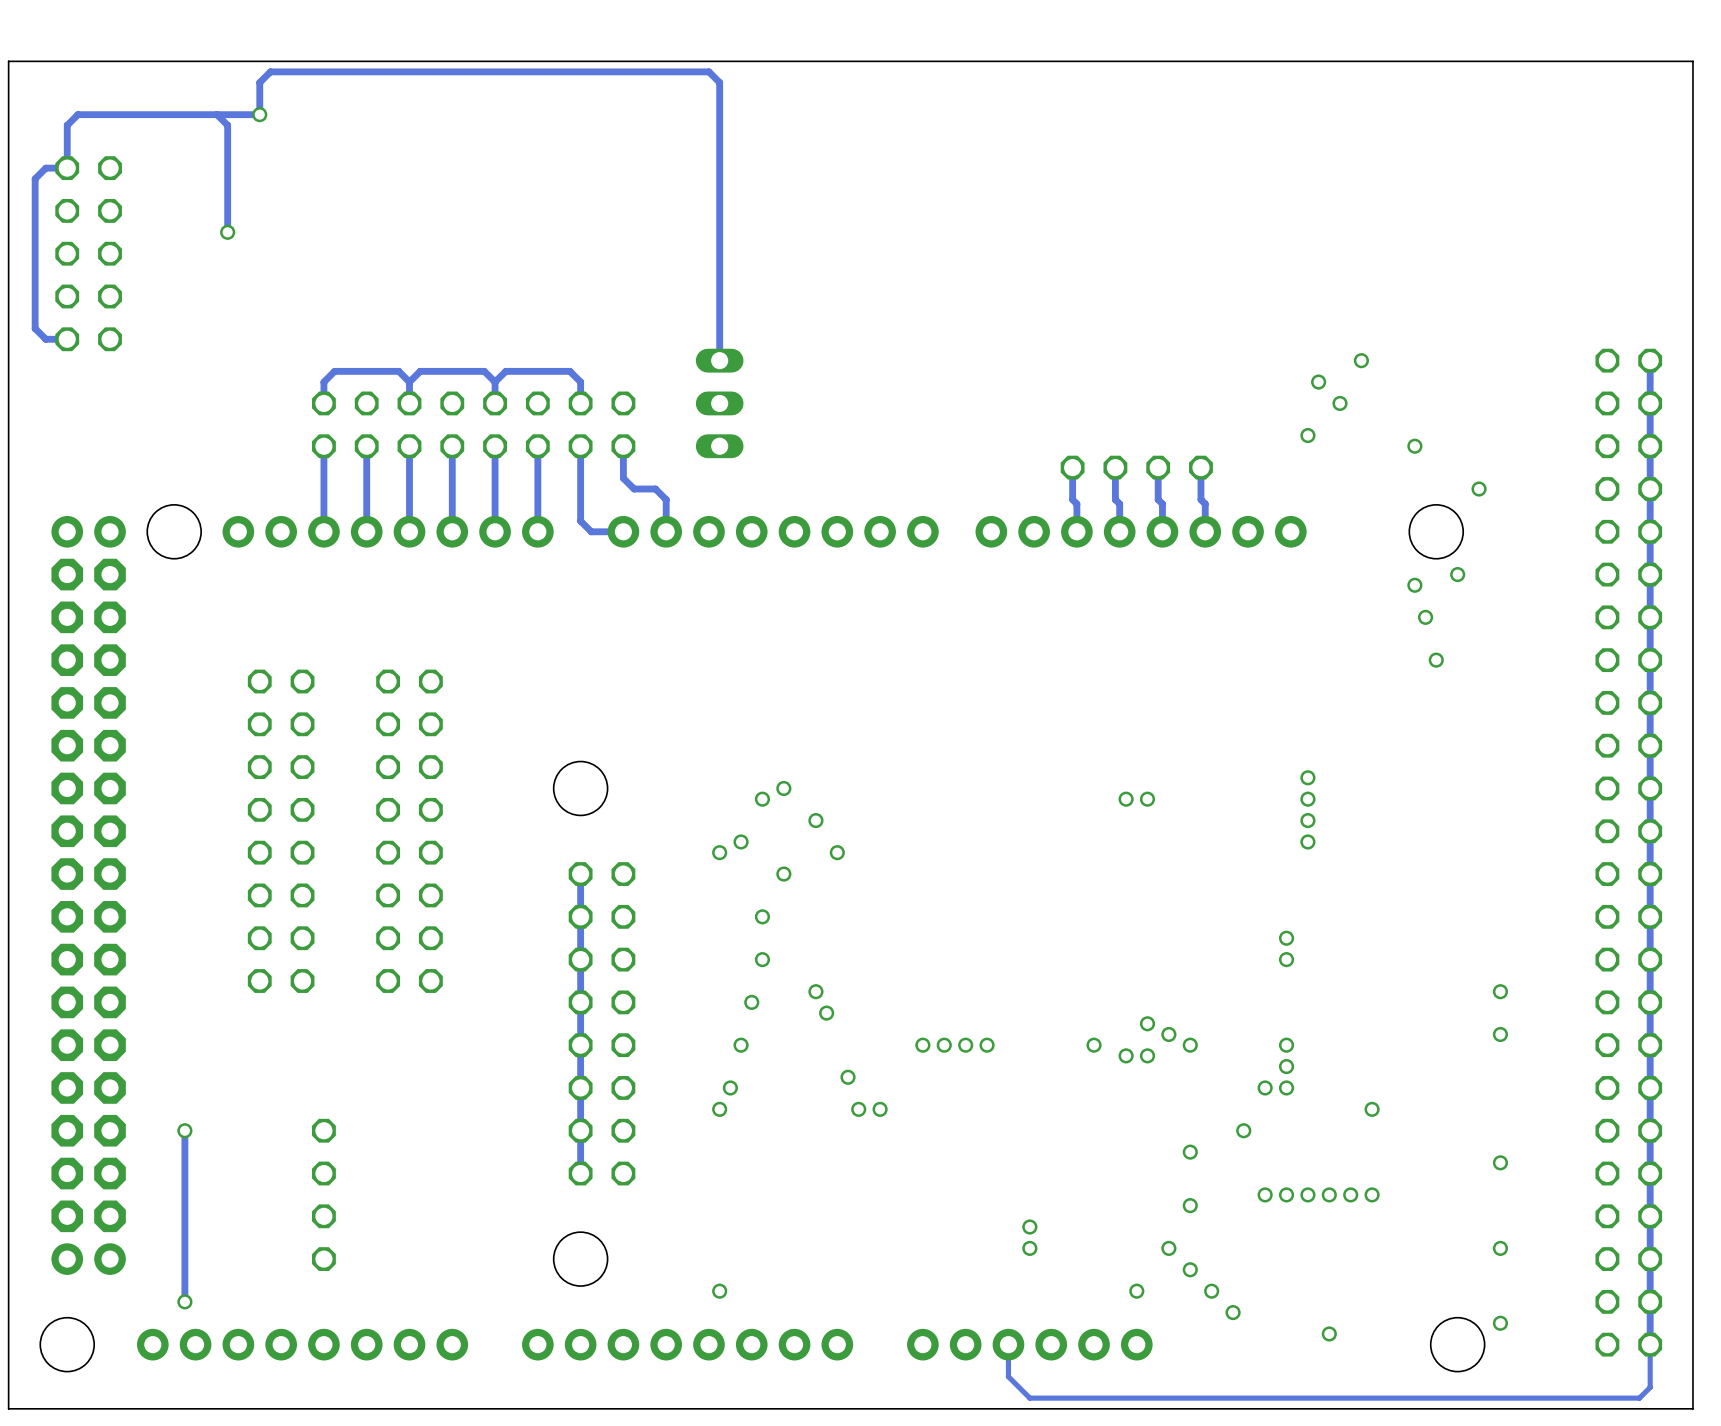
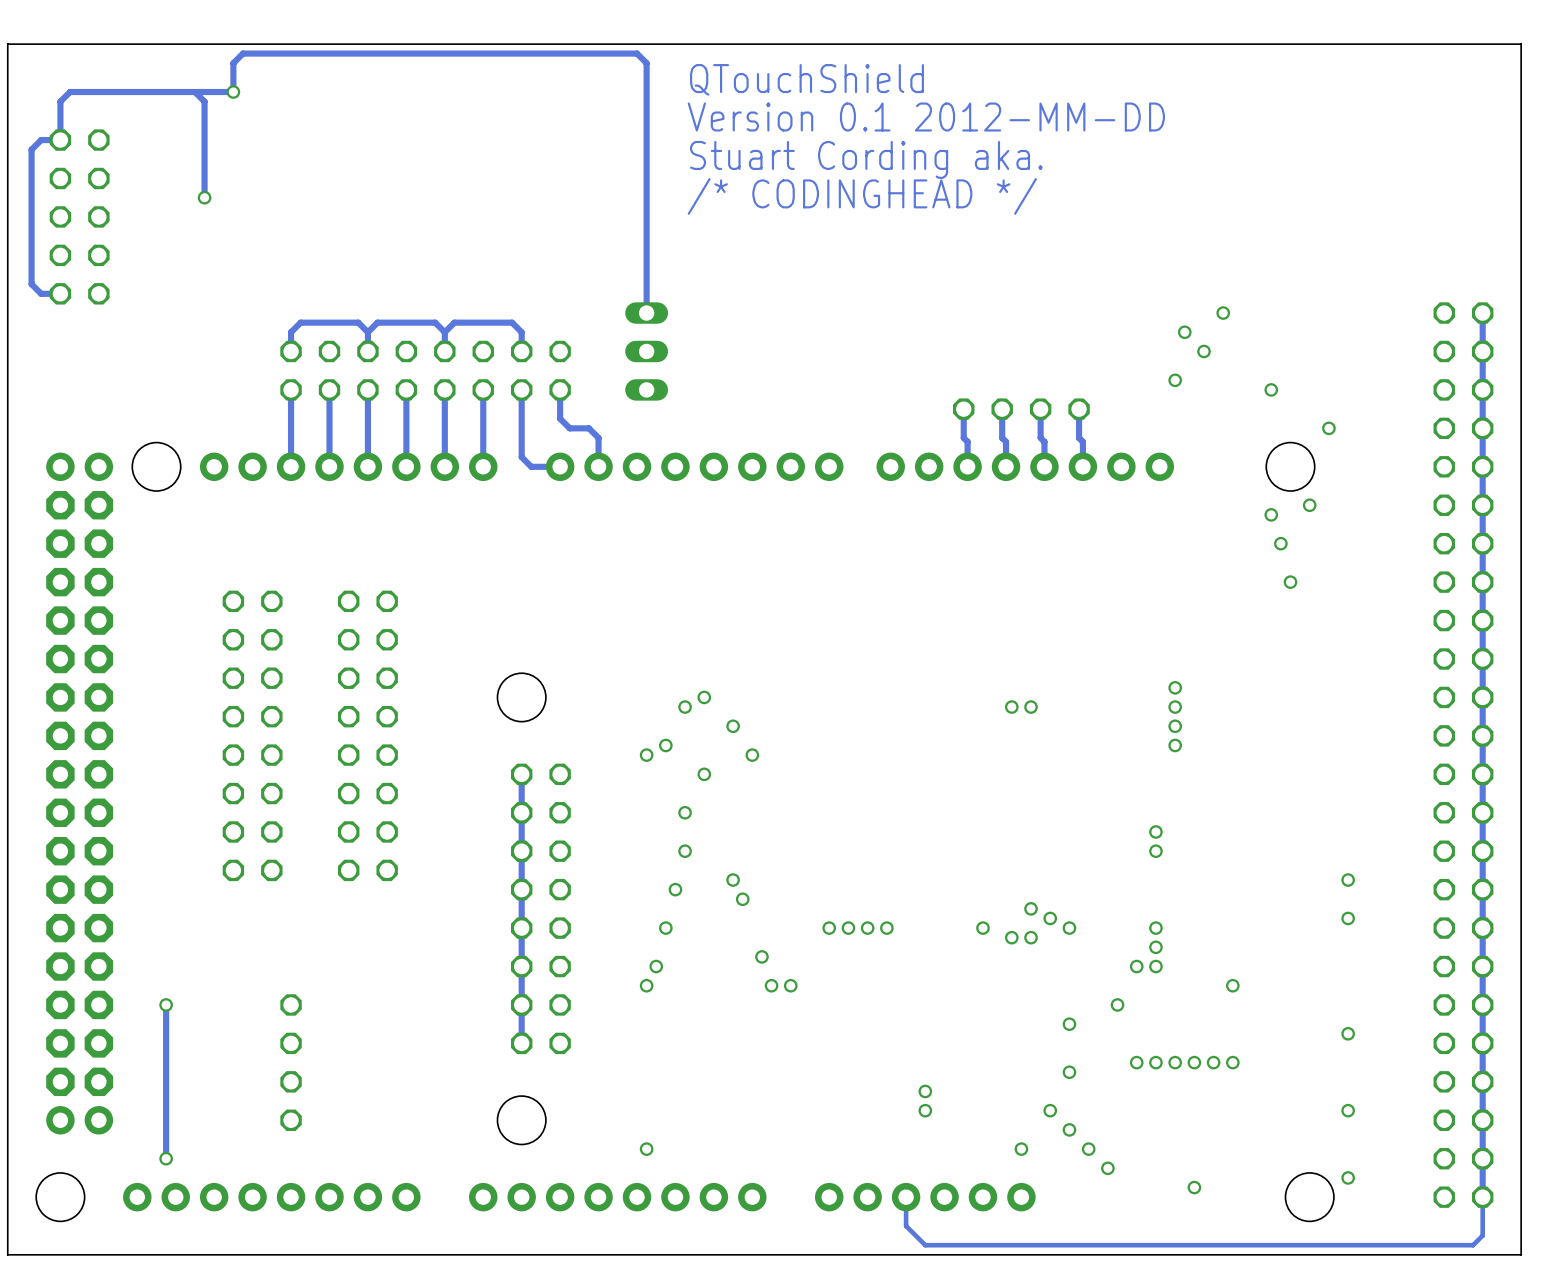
text: none -> QTouchShield (806, 79)
text: none -> Version 0.1 2012-MM-DD (926, 117)
text: none -> Stuart Cording aka. (866, 159)
text: none -> /* CODINGHEAD */ (862, 196)

